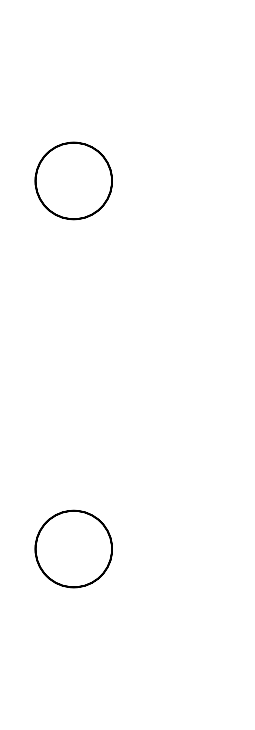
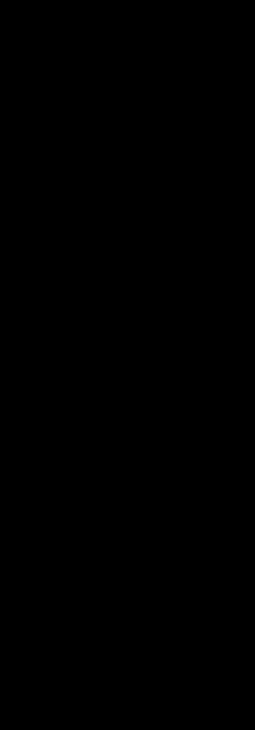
round board edge: [35, 142, 113, 220] -> none
round board edge: [35, 510, 113, 588] -> none

